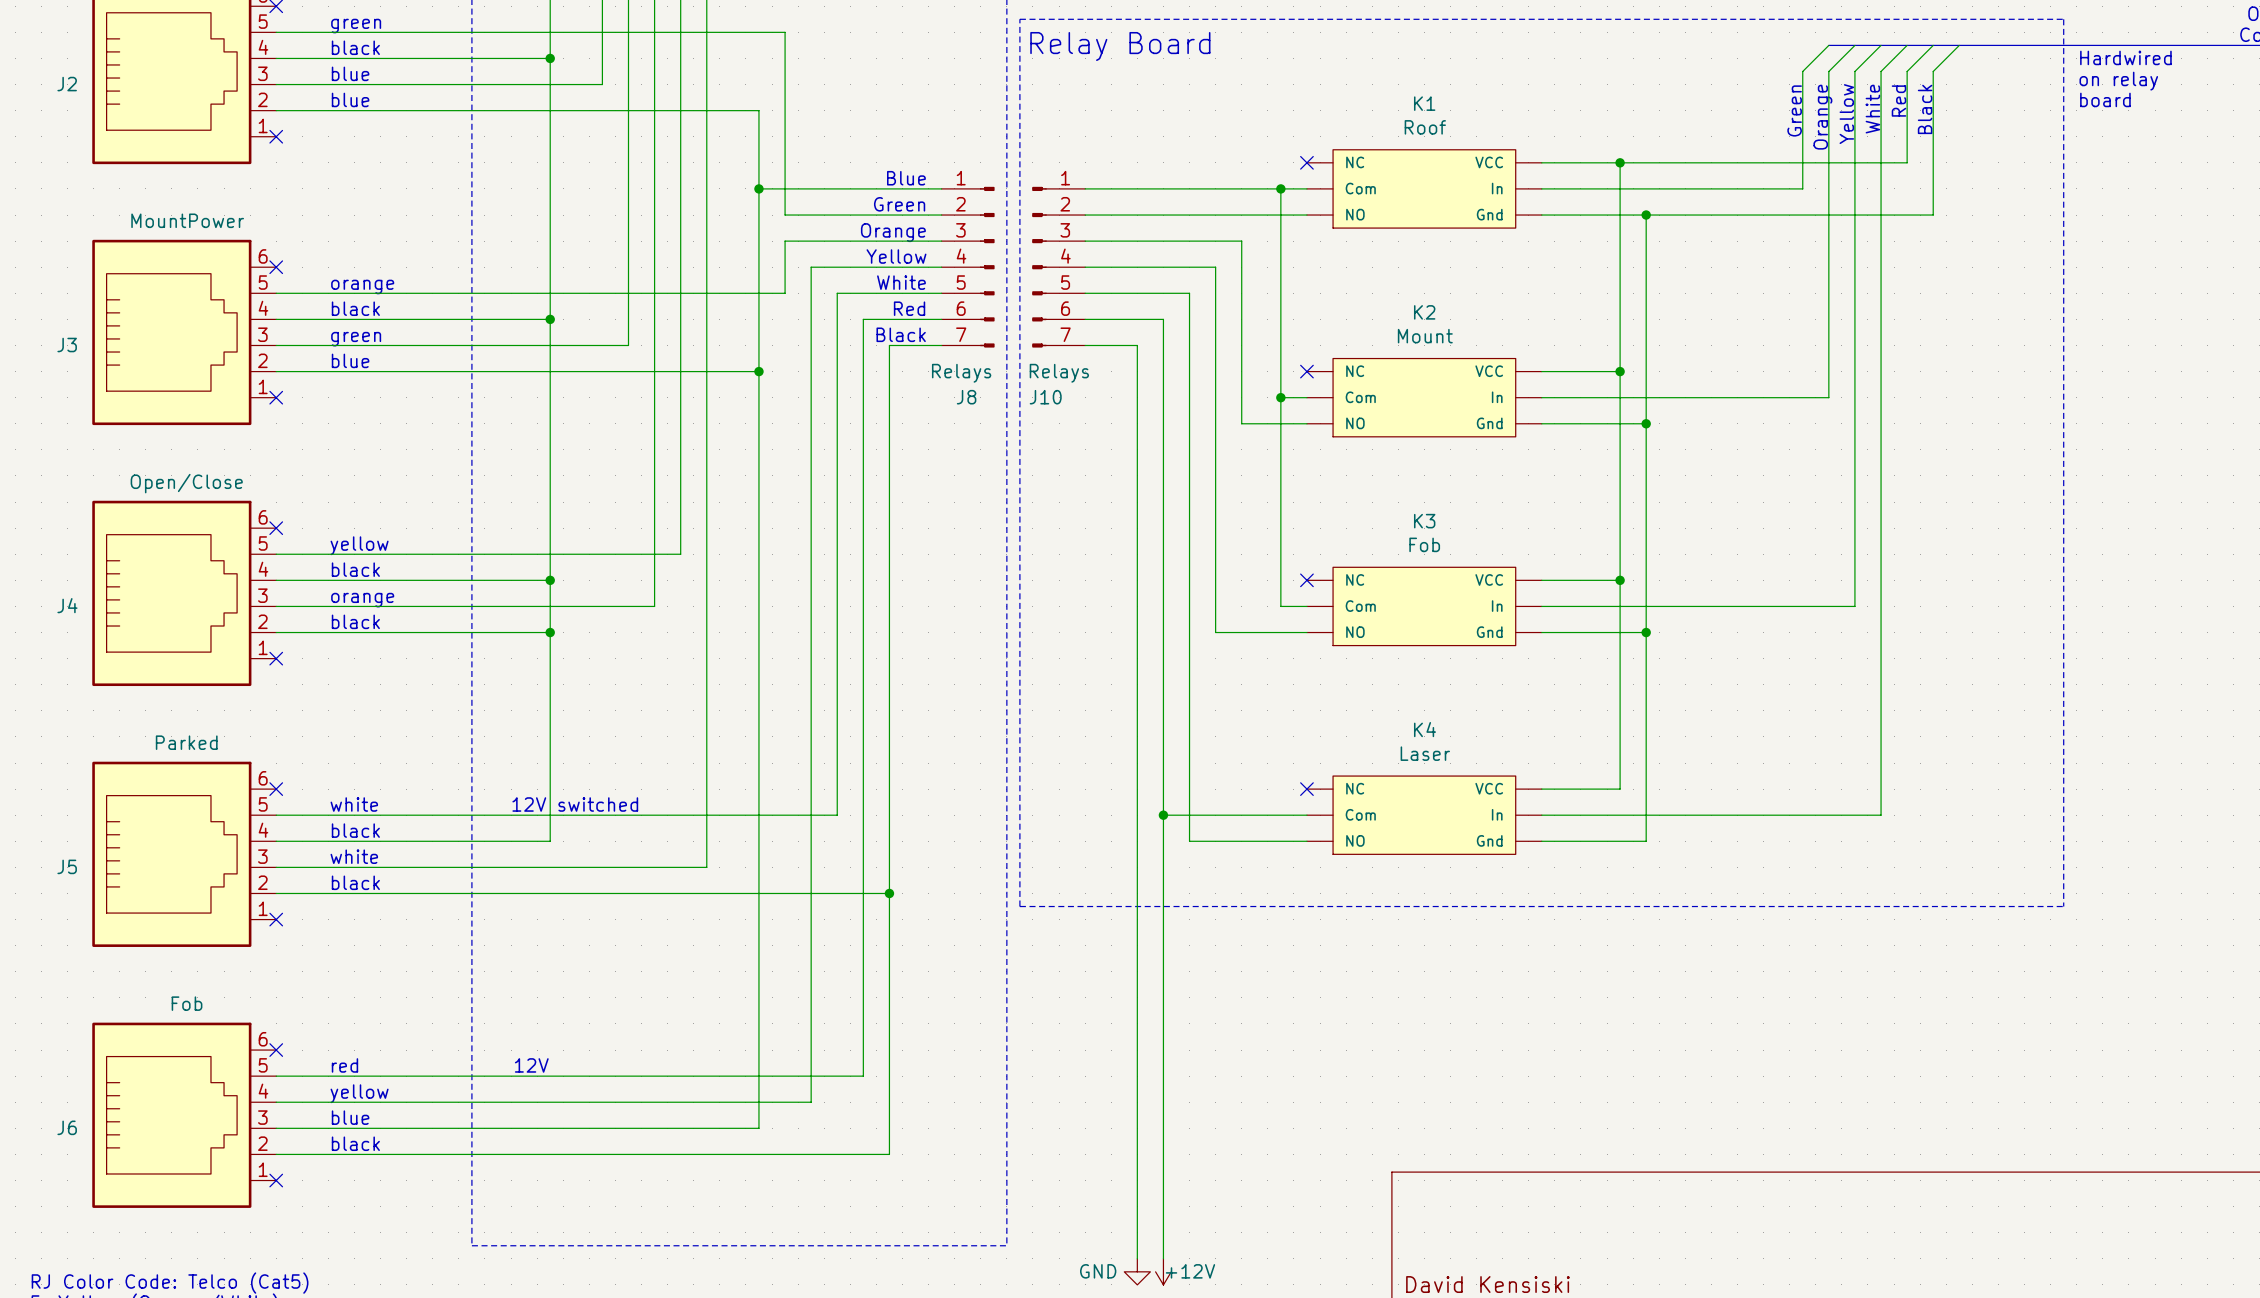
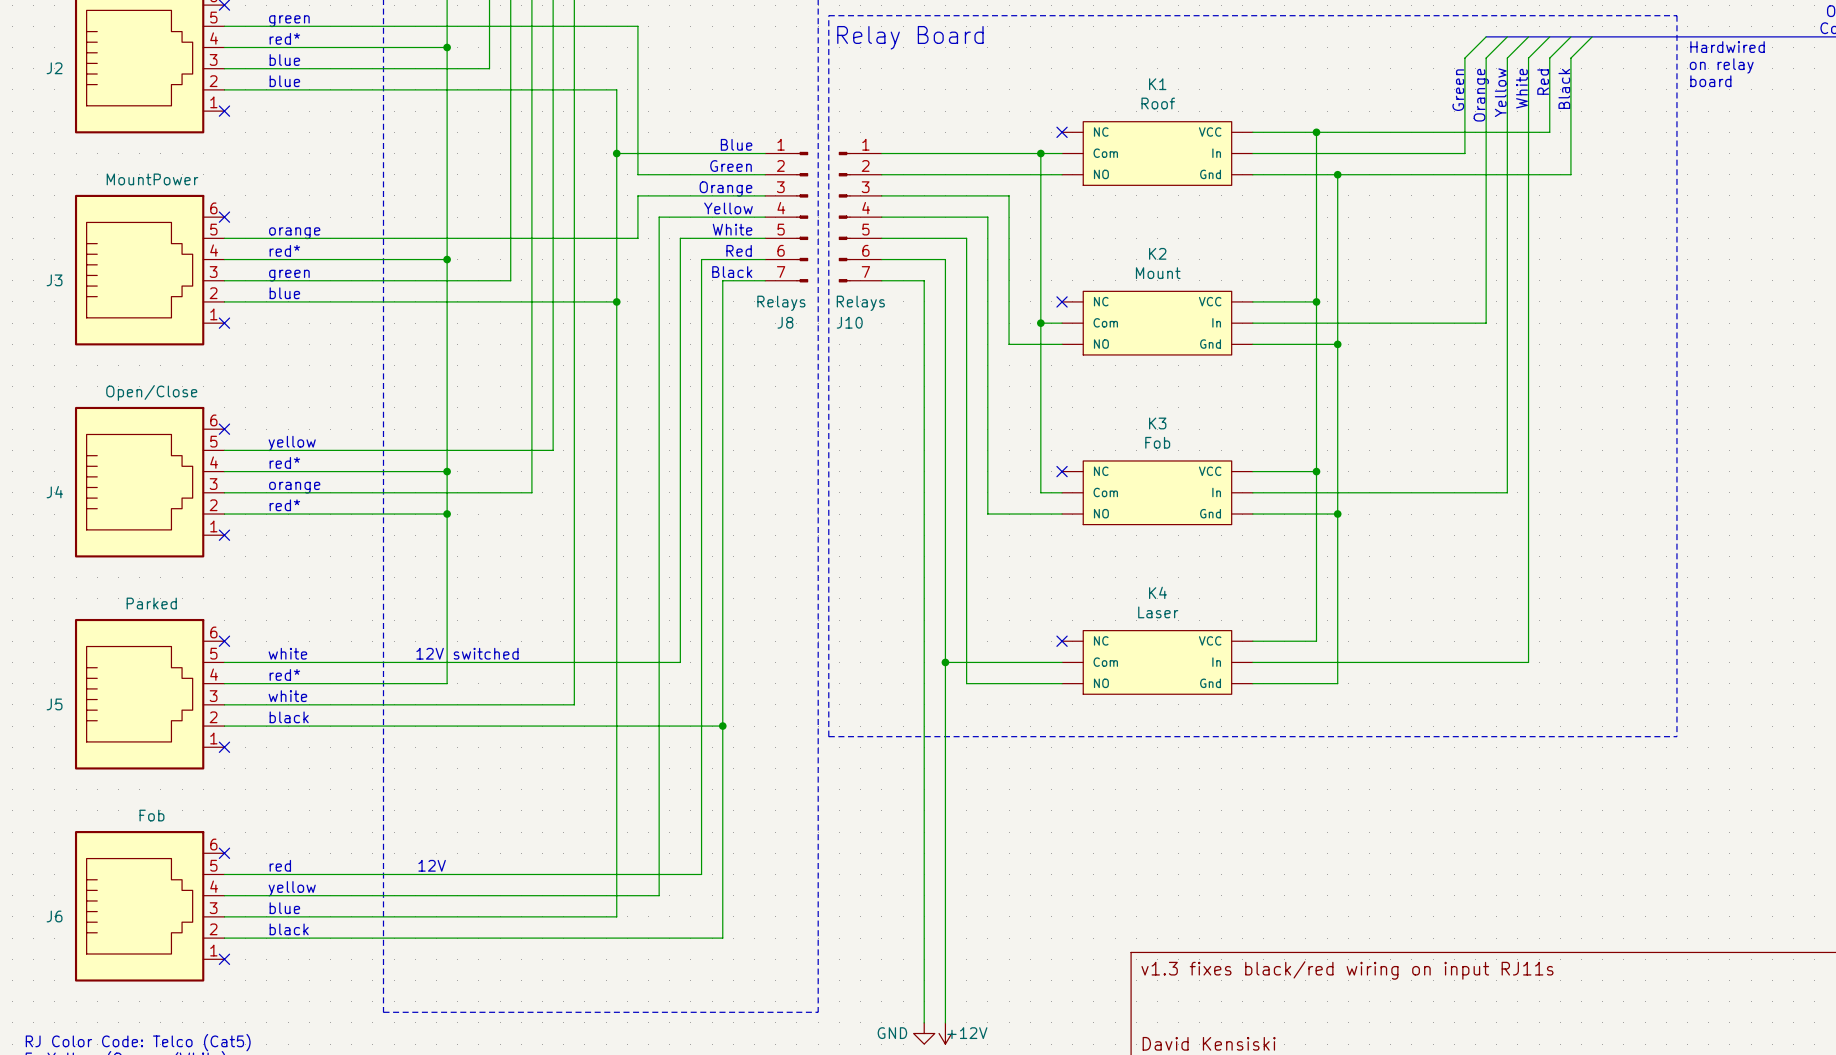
text: black (355, 47) -> red* (284, 38)
text: black (355, 308) -> red* (284, 250)
text: black (355, 569) -> red* (284, 462)
text: black (355, 621) -> red* (284, 505)
text: black (355, 830) -> red* (284, 674)
title block: none -> v1.3 fixes black/red wiring on input RJ11s (1347, 970)

